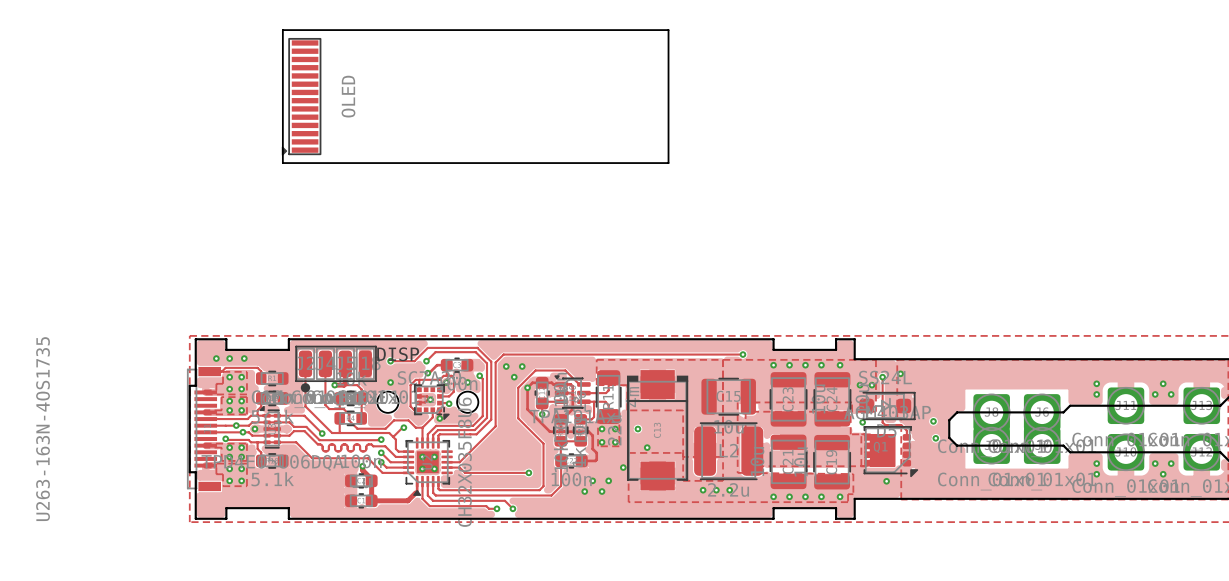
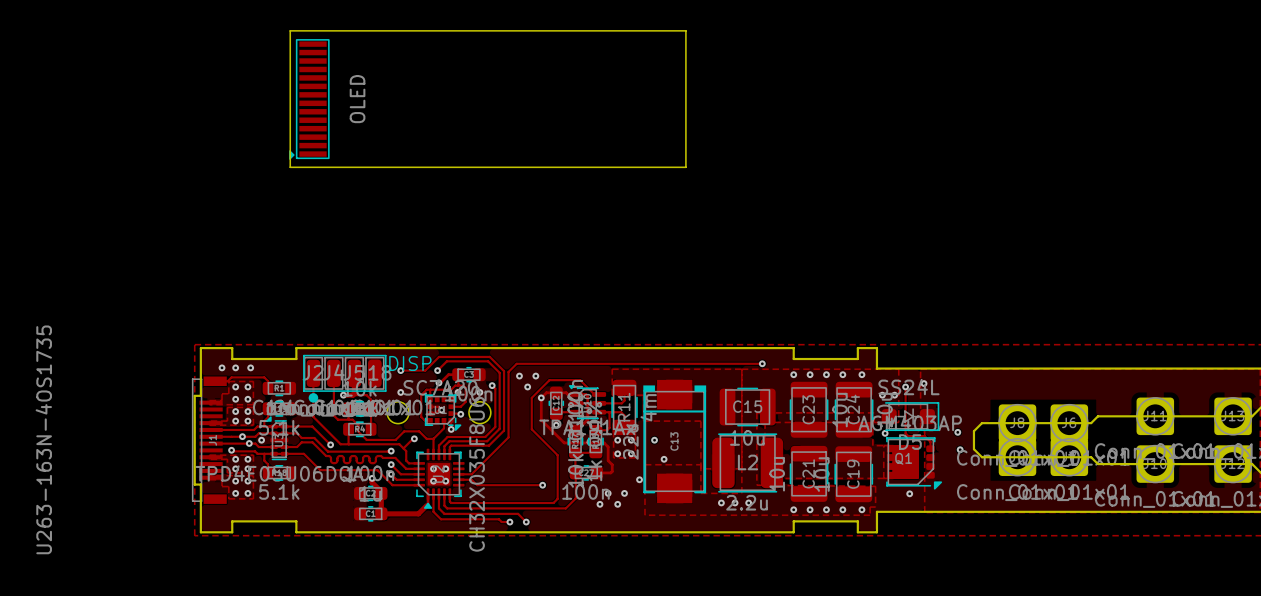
via: (1096, 383) -> none
via: (1163, 383) -> none
via: (1096, 394) -> none
via: (1155, 394) -> none
via: (1171, 394) -> none
via: (1096, 463) -> none
via: (1155, 463) -> none
via: (1171, 463) -> none
via: (1096, 474) -> none
via: (1163, 474) -> none

